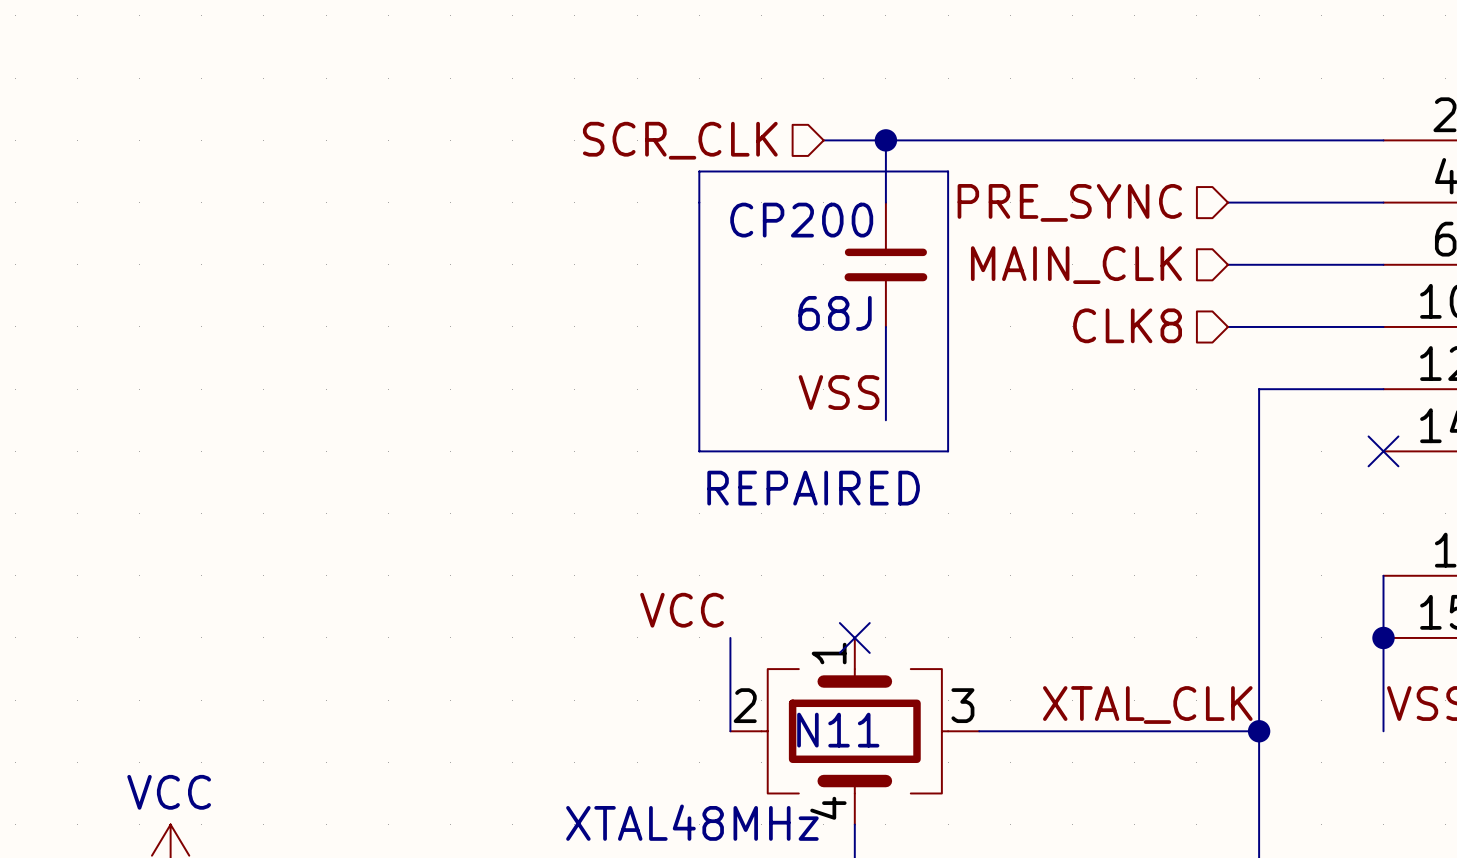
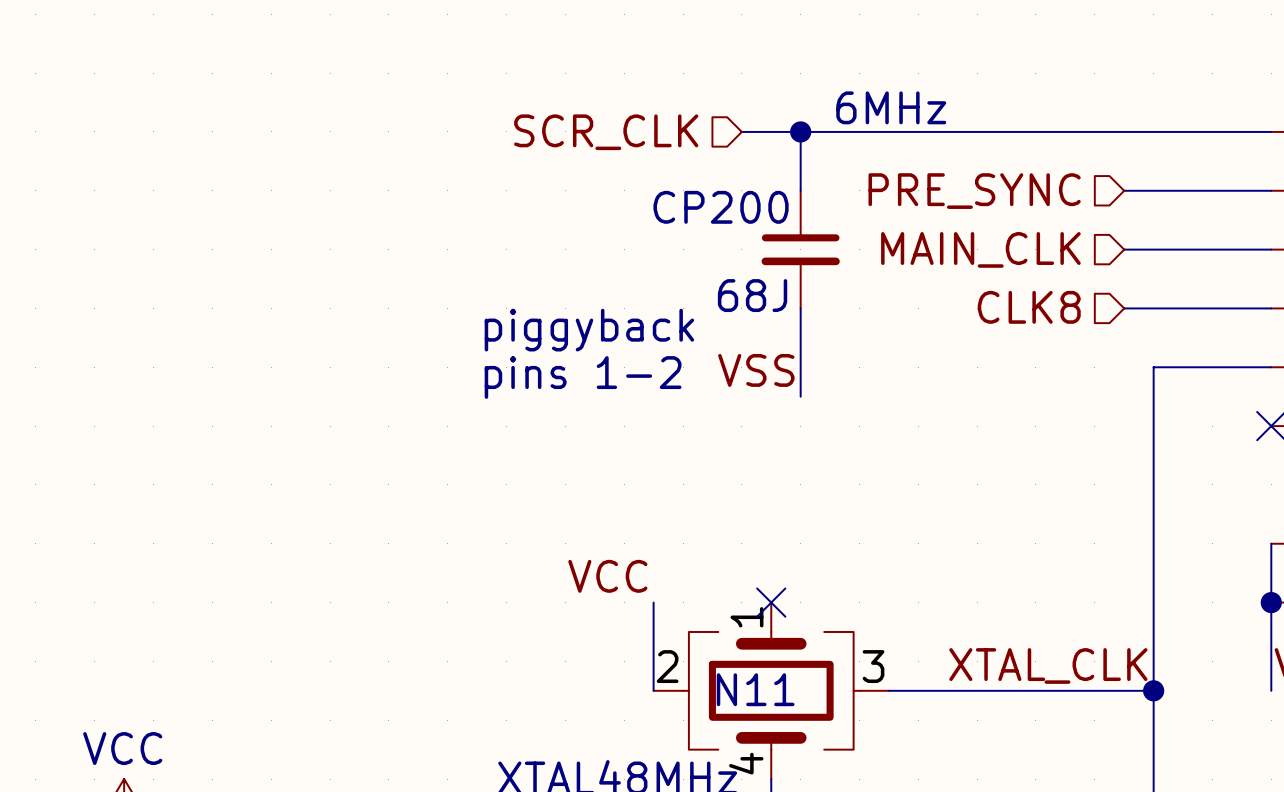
text: none -> 6MHz (891, 107)
line: (699, 171) (699, 451) (948, 451) (948, 171) (699, 171) -> none
text: none -> piggyback (589, 330)
text: none -> pins 1-2 (583, 377)
text: REPAIRED (813, 488) -> none

